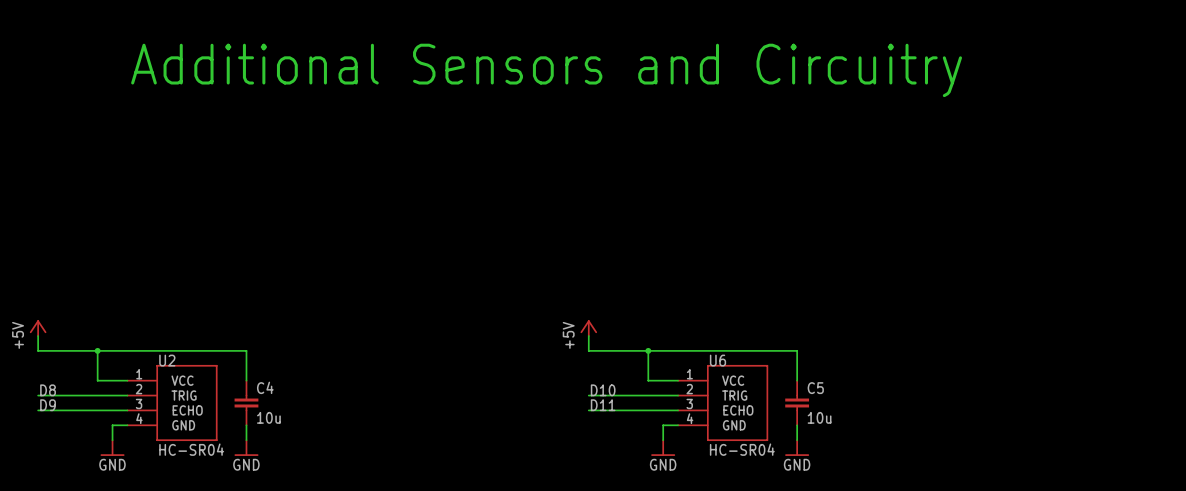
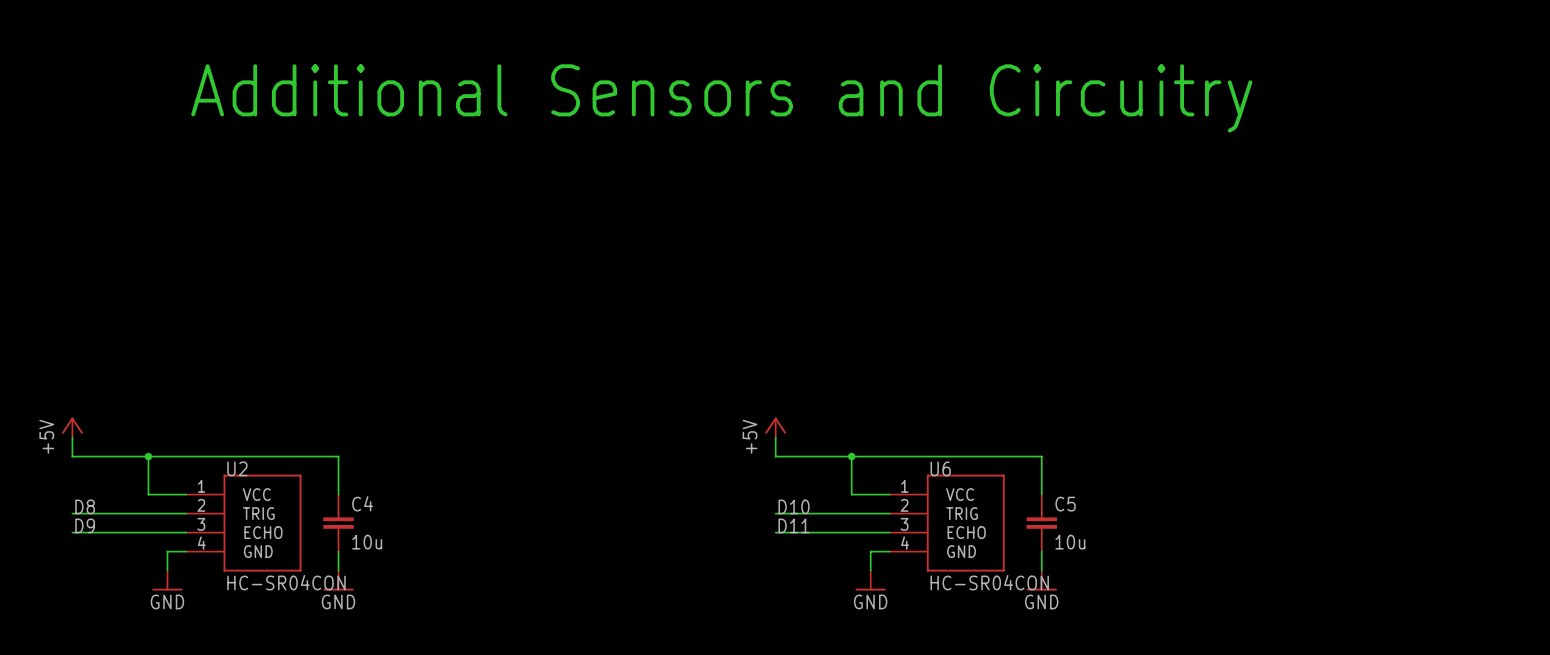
U2 value: HC-SR04 (191, 449) -> HC-SR04CON (286, 582)
U6 value: HC-SR04 (742, 449) -> HC-SR04CON (989, 582)

